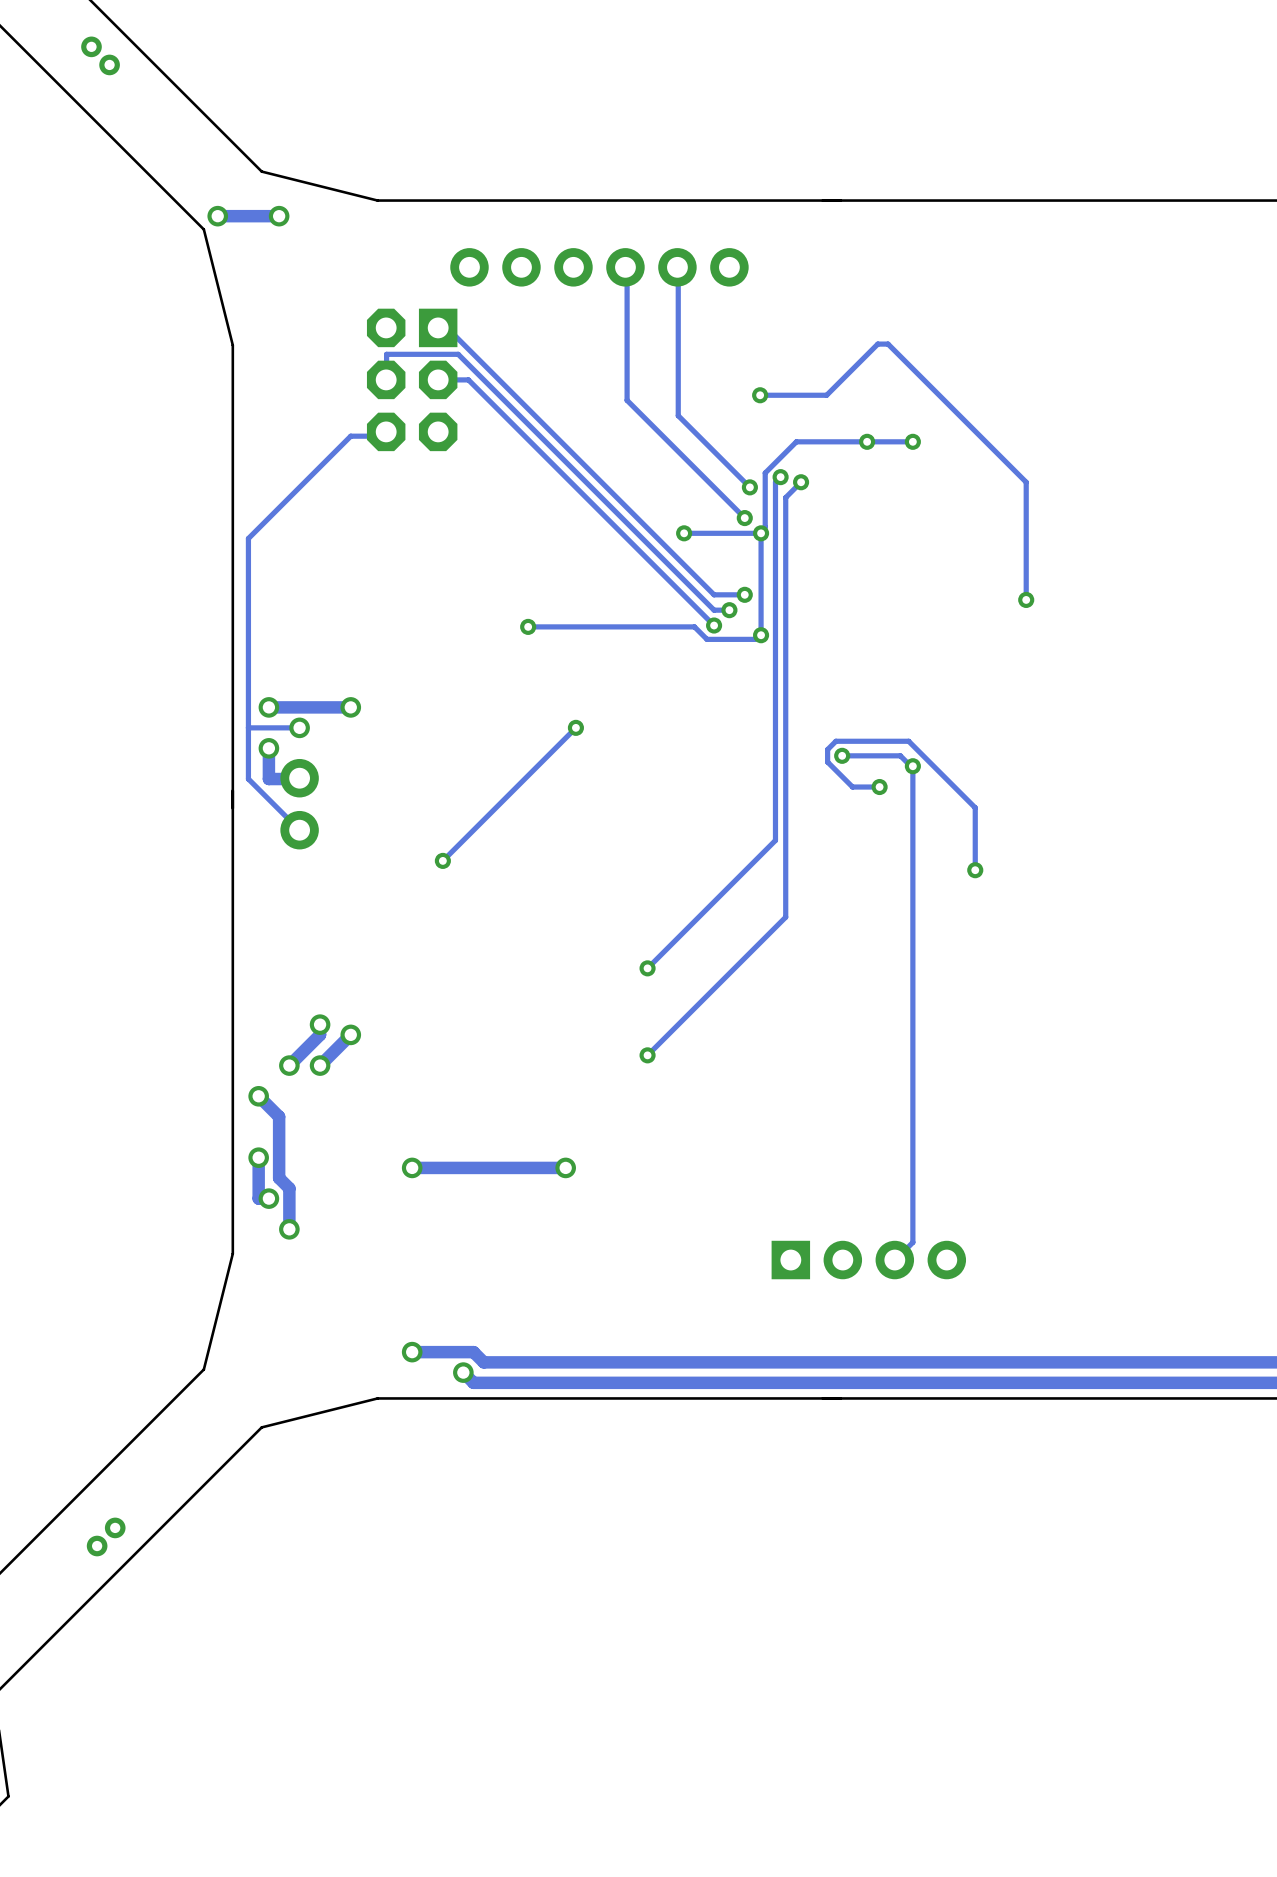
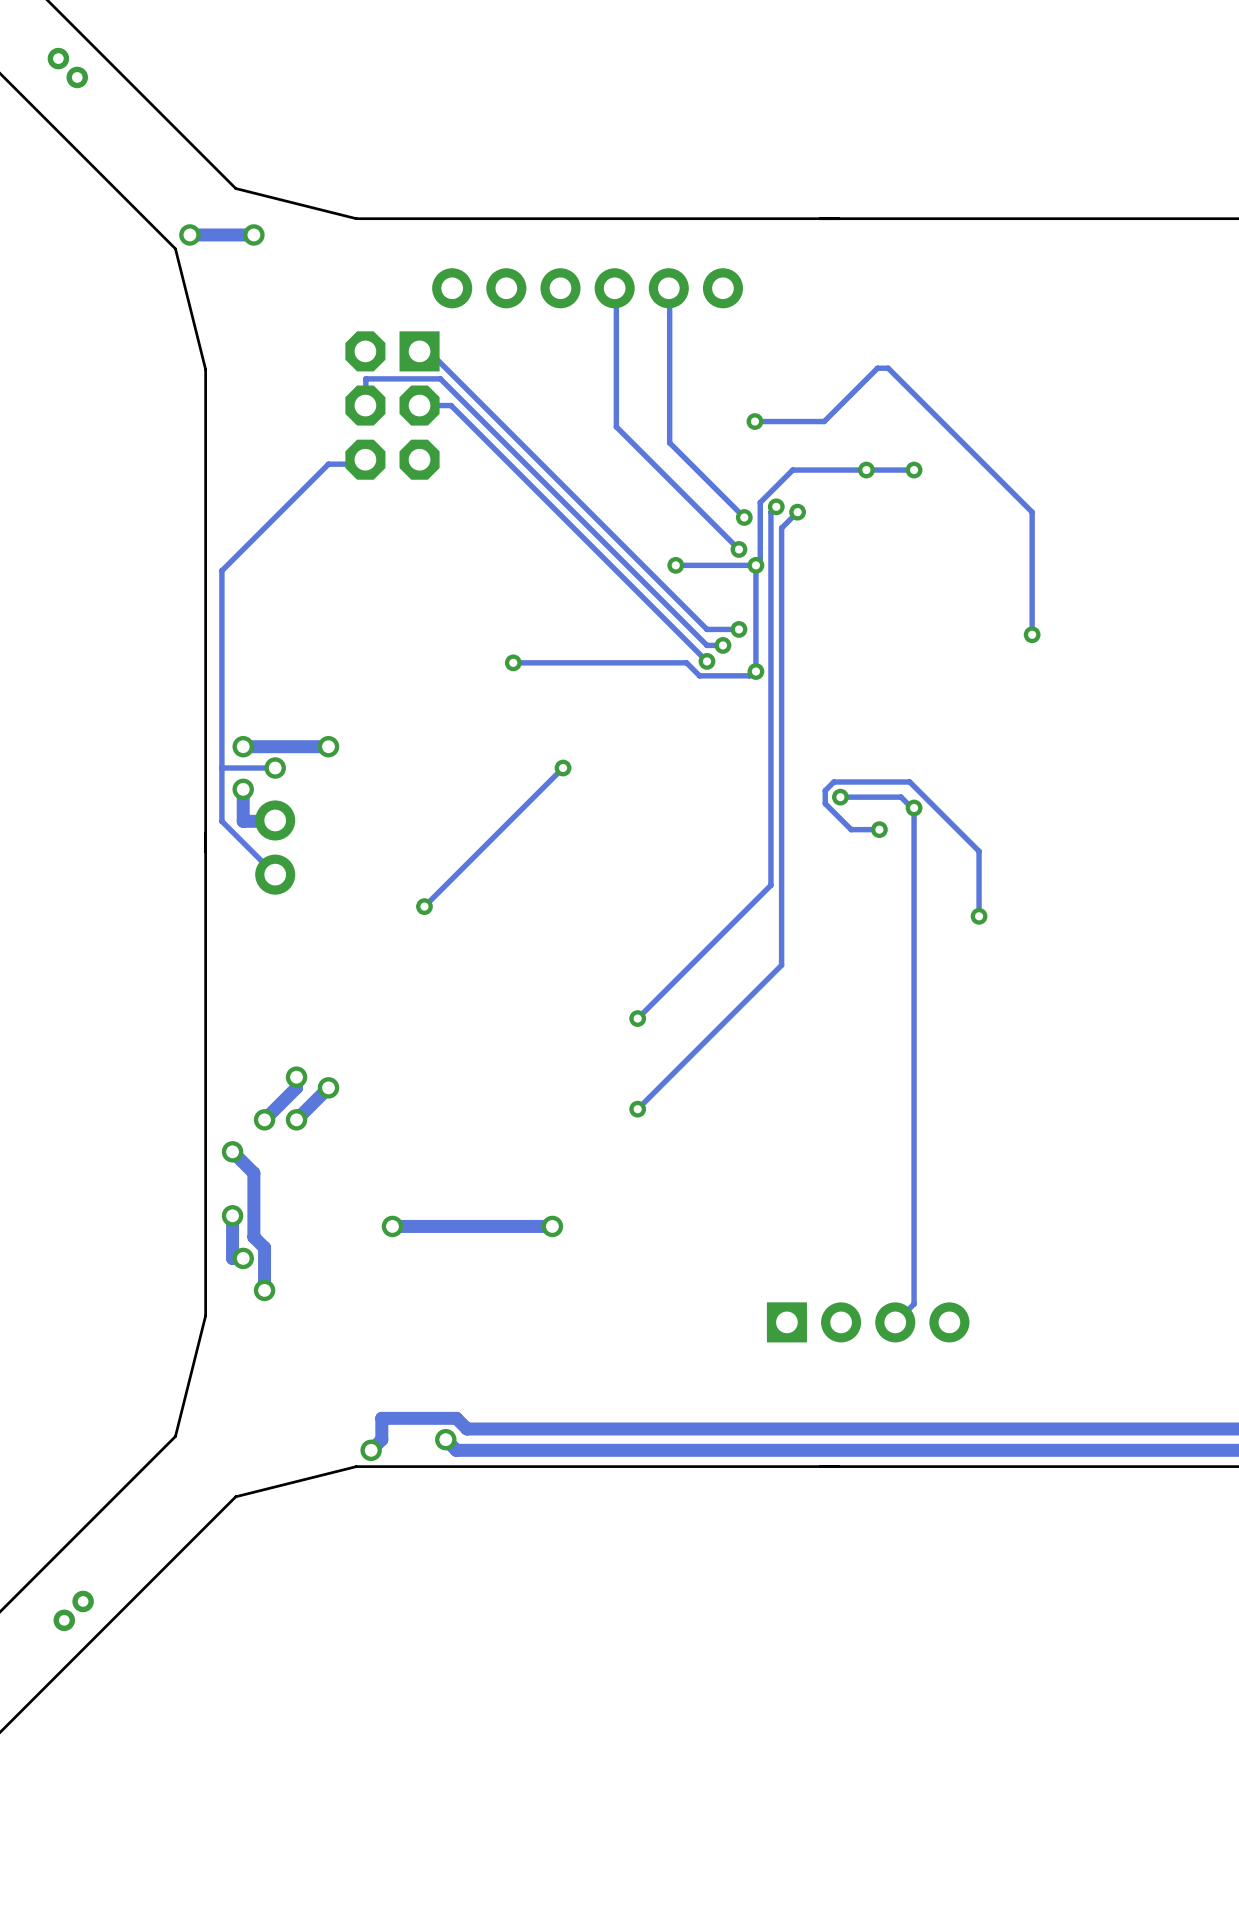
track: none -> (392, 1418) (381, 1418) (381, 1439) (371, 1450)
via position: (412, 1352) -> (371, 1450)

